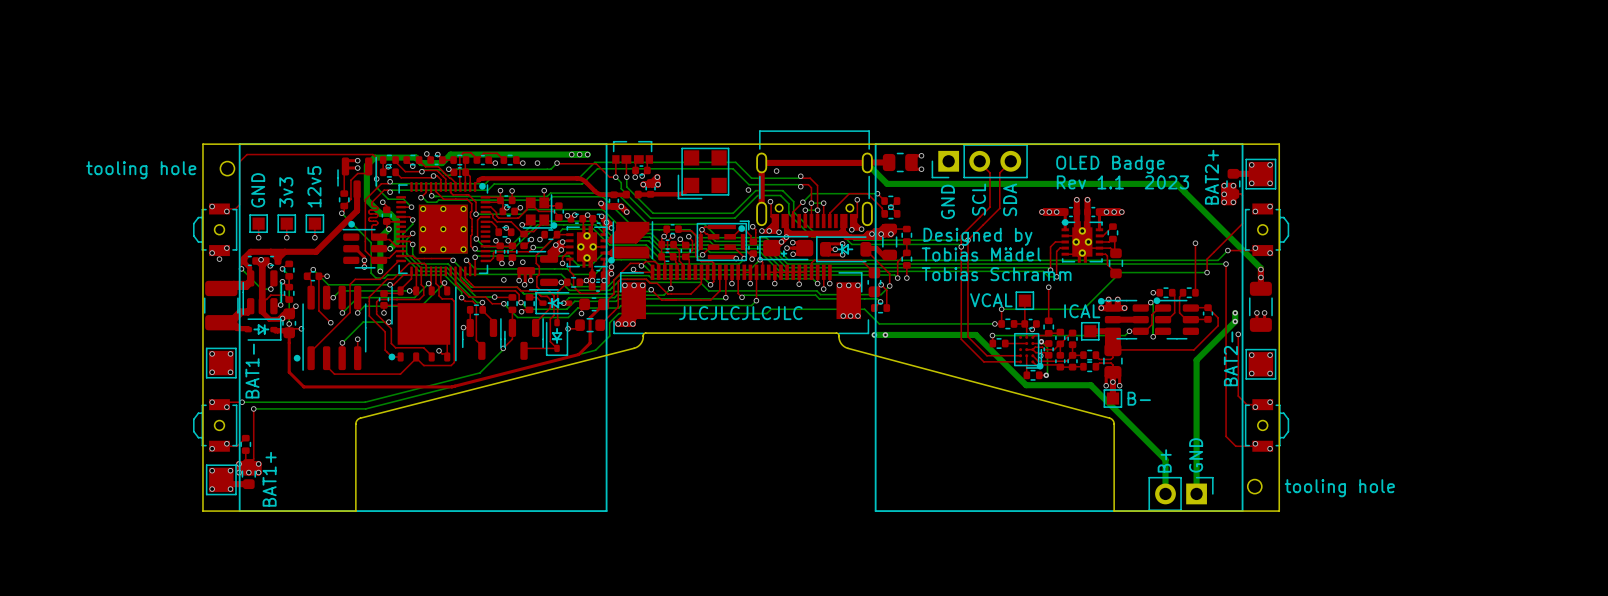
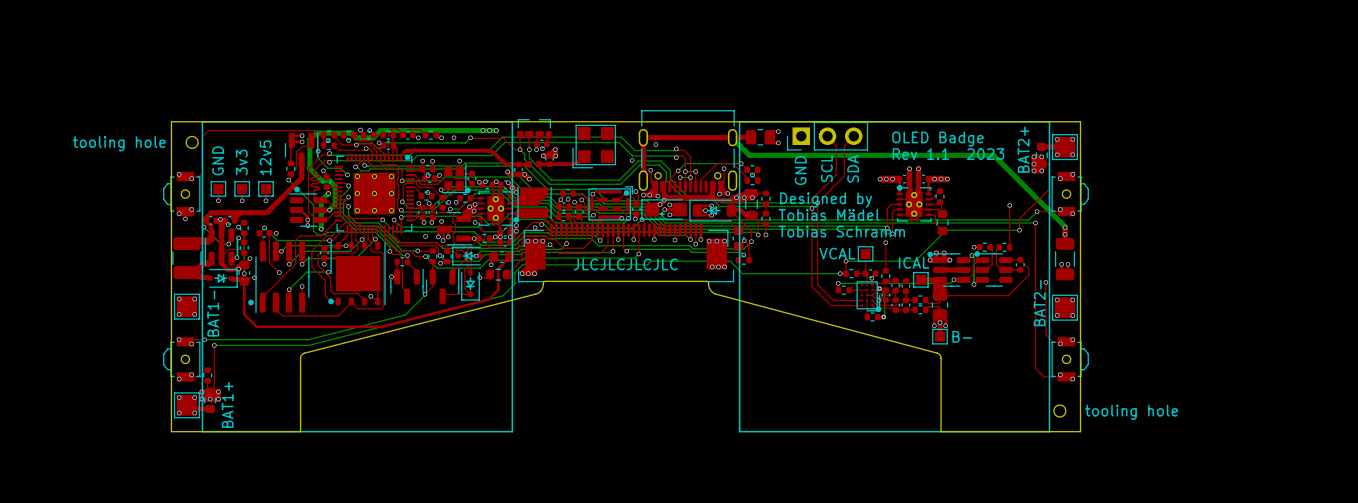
bottom track: (1235, 312) (1235, 321) (1196, 360) (1196, 493) -> none
via: (1235, 312) -> none
via: (1235, 321) -> none
bottom track: (874, 334) (975, 334) (1026, 385) (1090, 385) (1165, 459) (1165, 493) -> none
via: (874, 334) -> none
via: (885, 334) -> none
text: GND (1196, 455) -> none
text: B+ (1164, 460) -> none
part: (1181, 493) -> none

